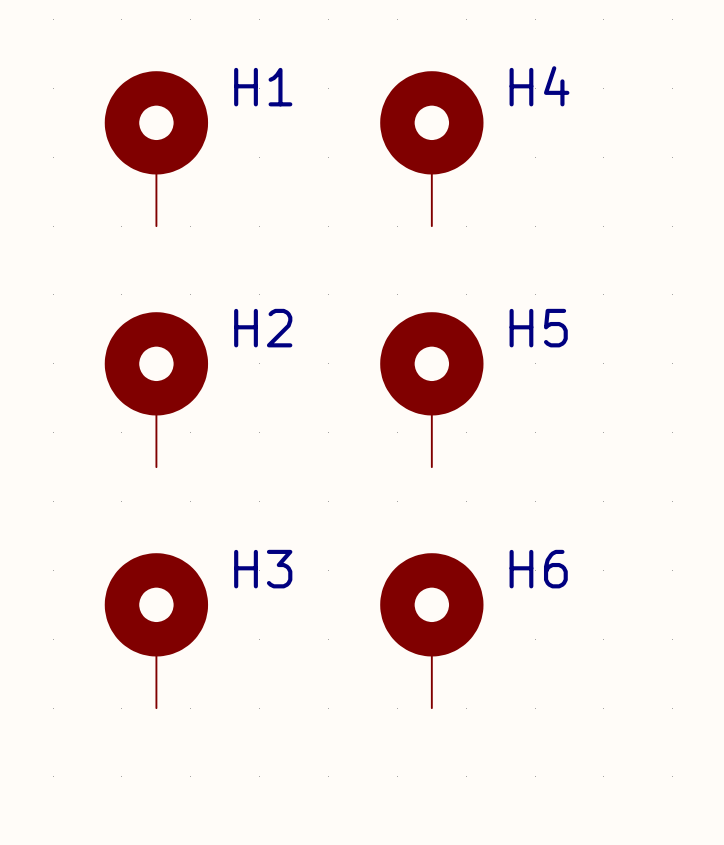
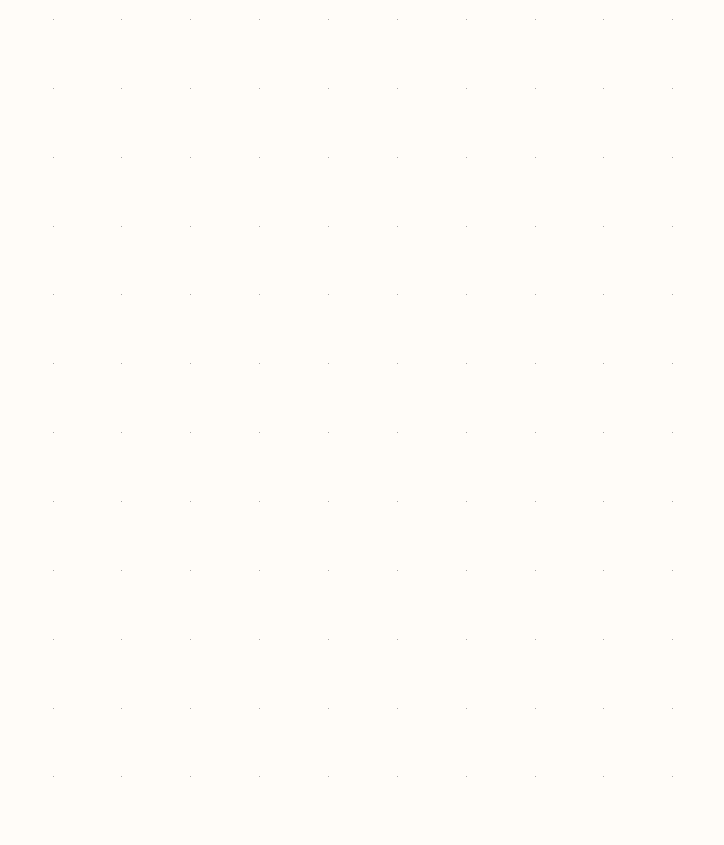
H1: (156, 148) -> none
H4: (431, 148) -> none
H2: (156, 389) -> none
H5: (431, 389) -> none
H3: (156, 630) -> none
H6: (431, 630) -> none

